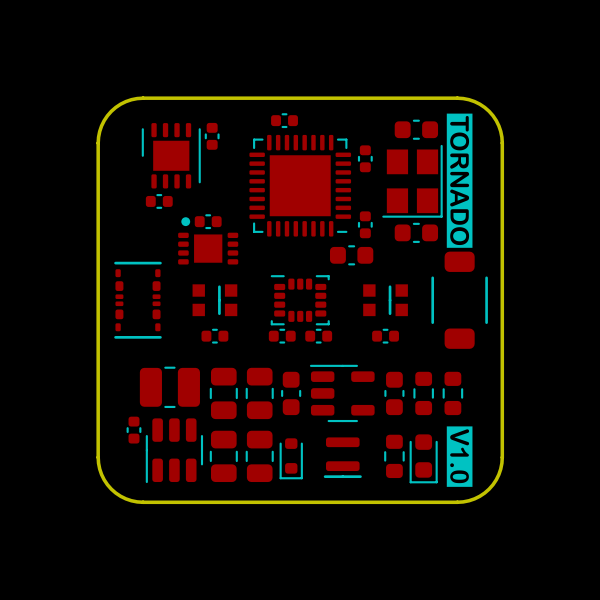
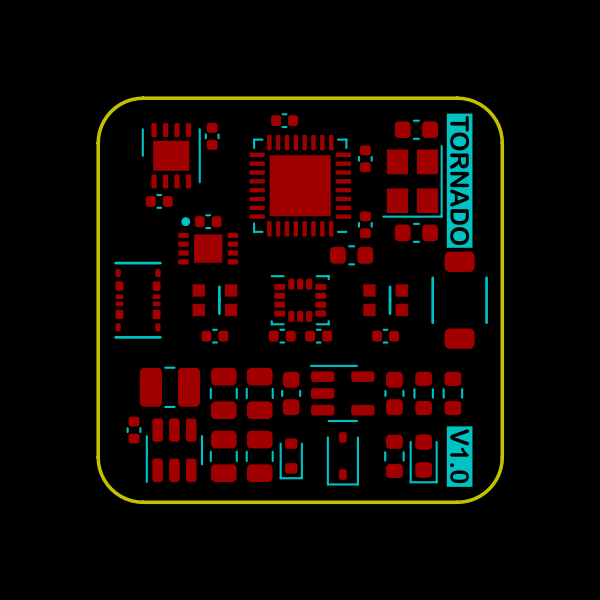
part footprint: [323, 437, 362, 479] -> [326, 432, 359, 486]

